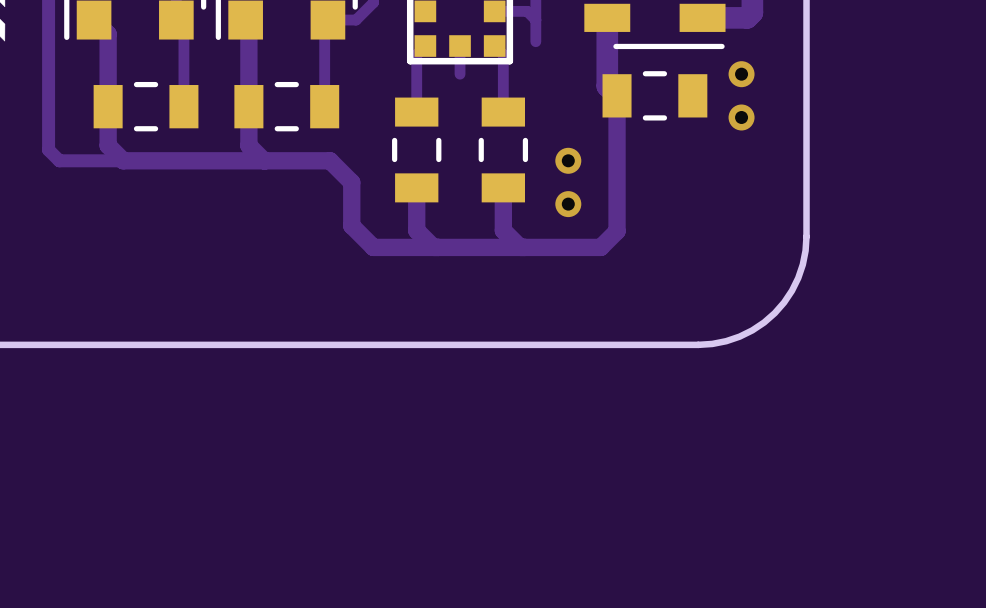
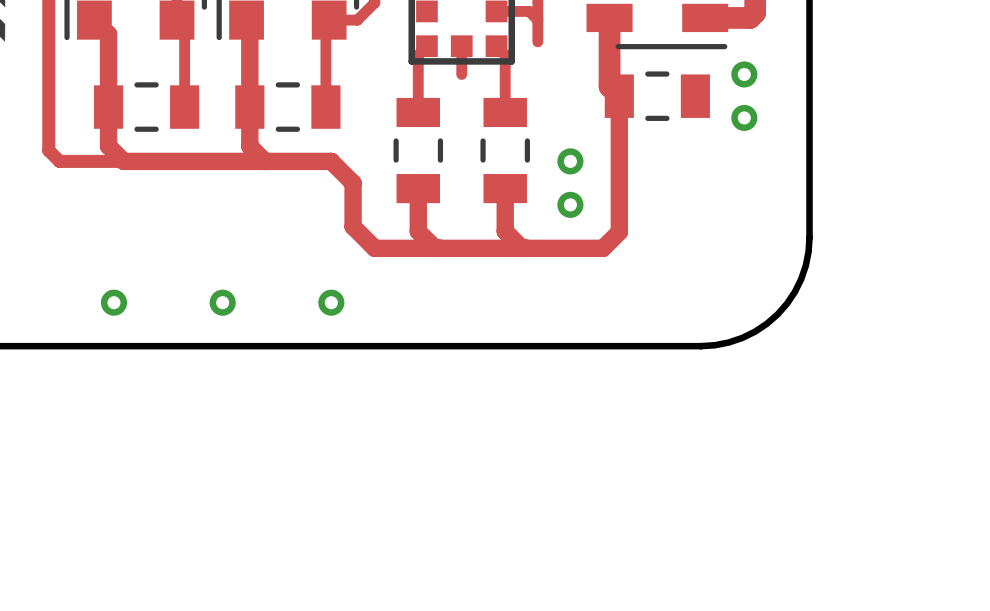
via: none -> (113, 302)
via: none -> (222, 302)
via: none -> (331, 302)

